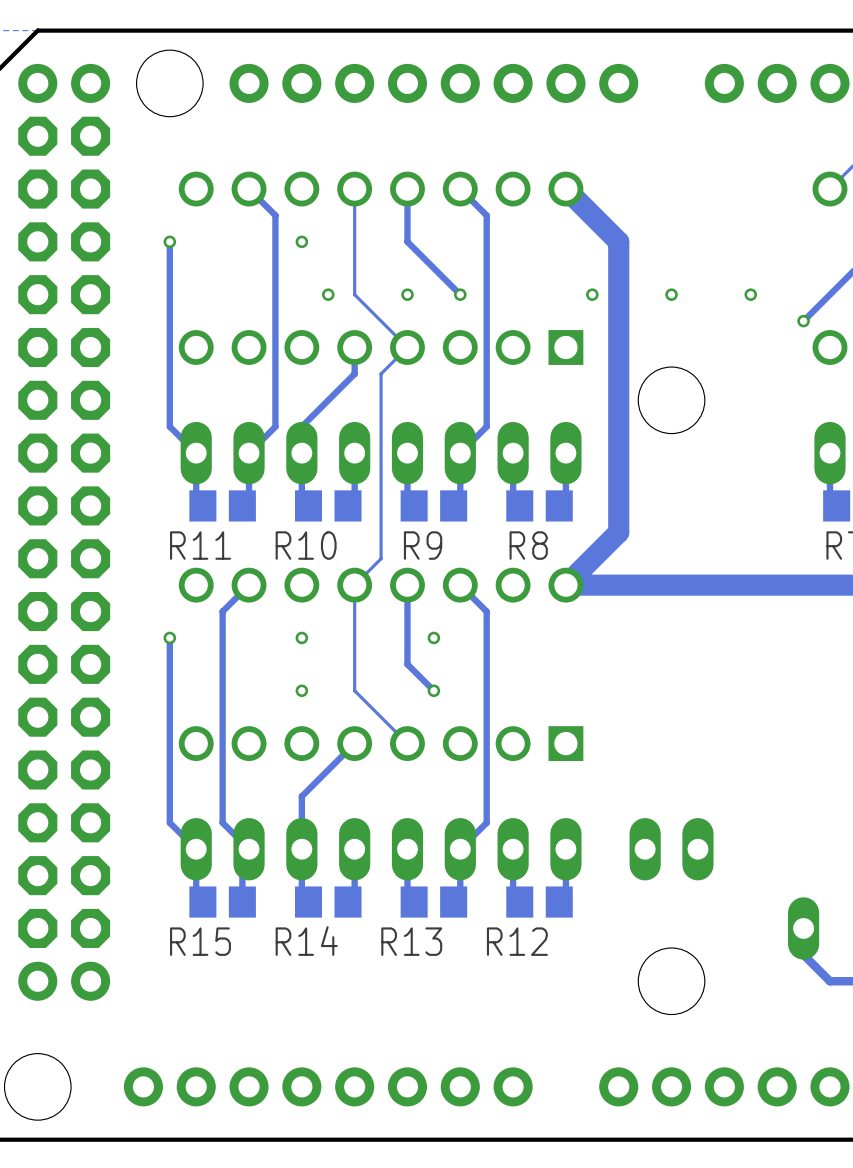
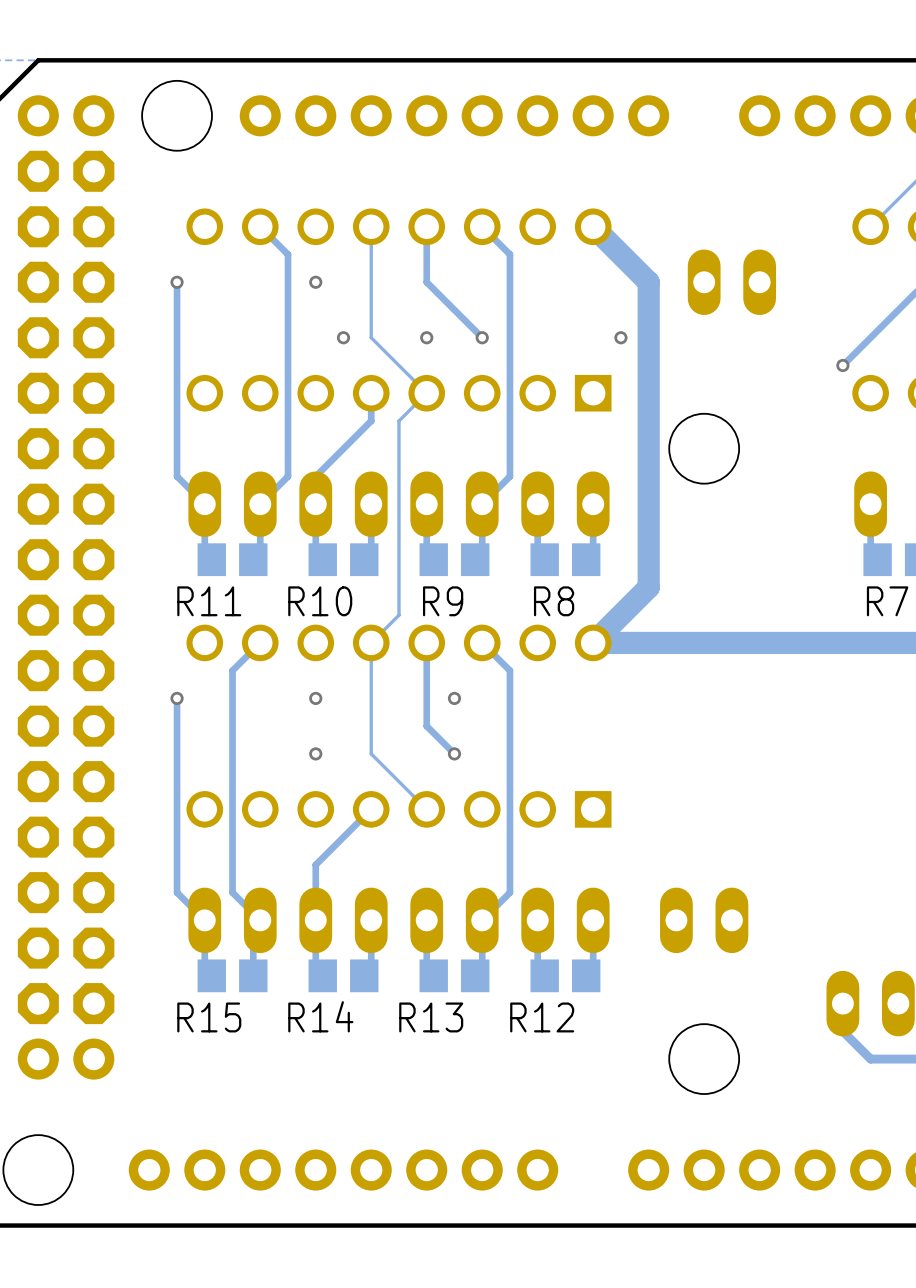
part: none -> (731, 282)
via: (671, 294) -> none
via: (750, 294) -> none

